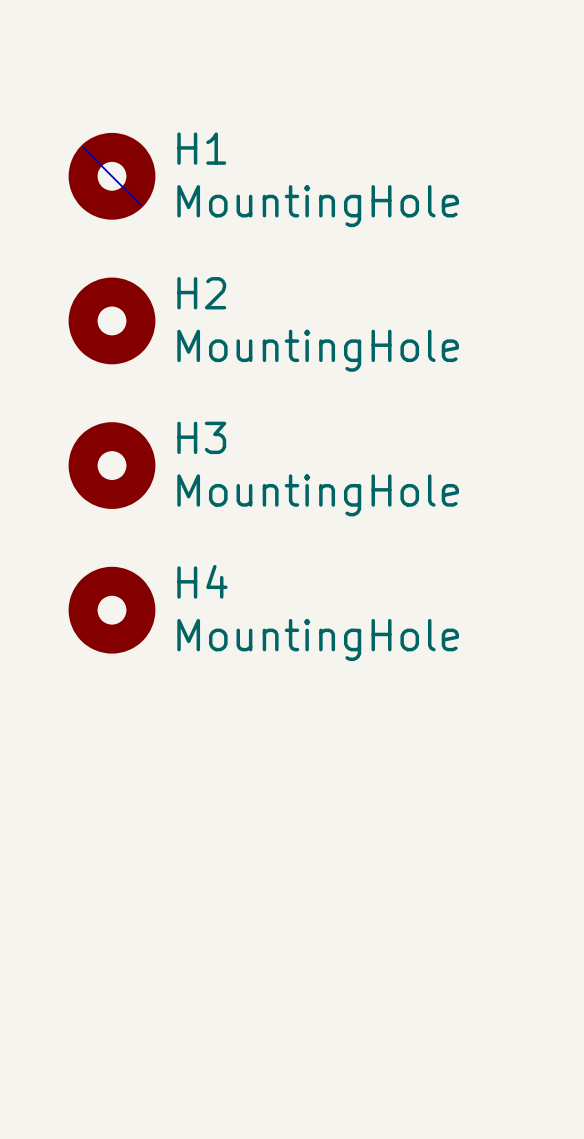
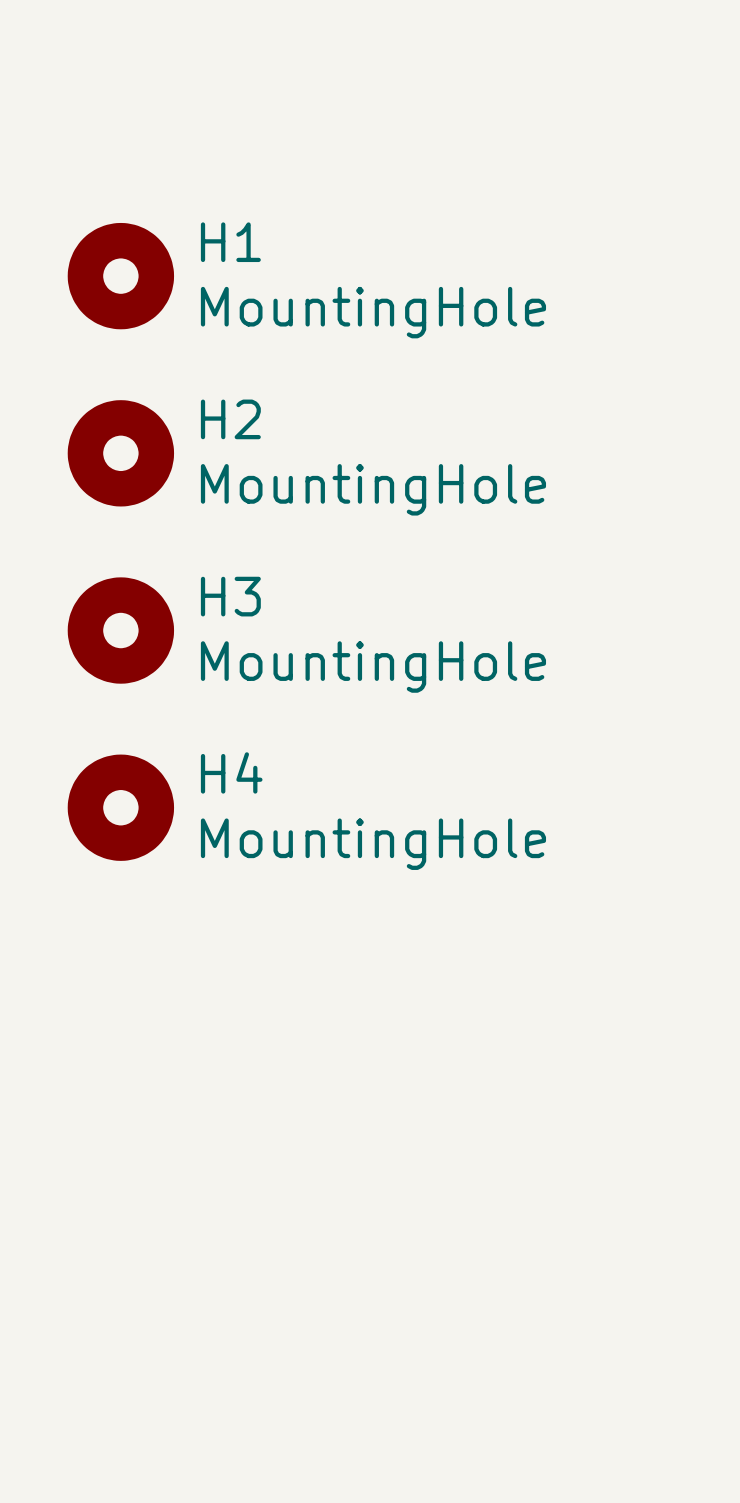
bus: (83, 147) (140, 205) -> none

